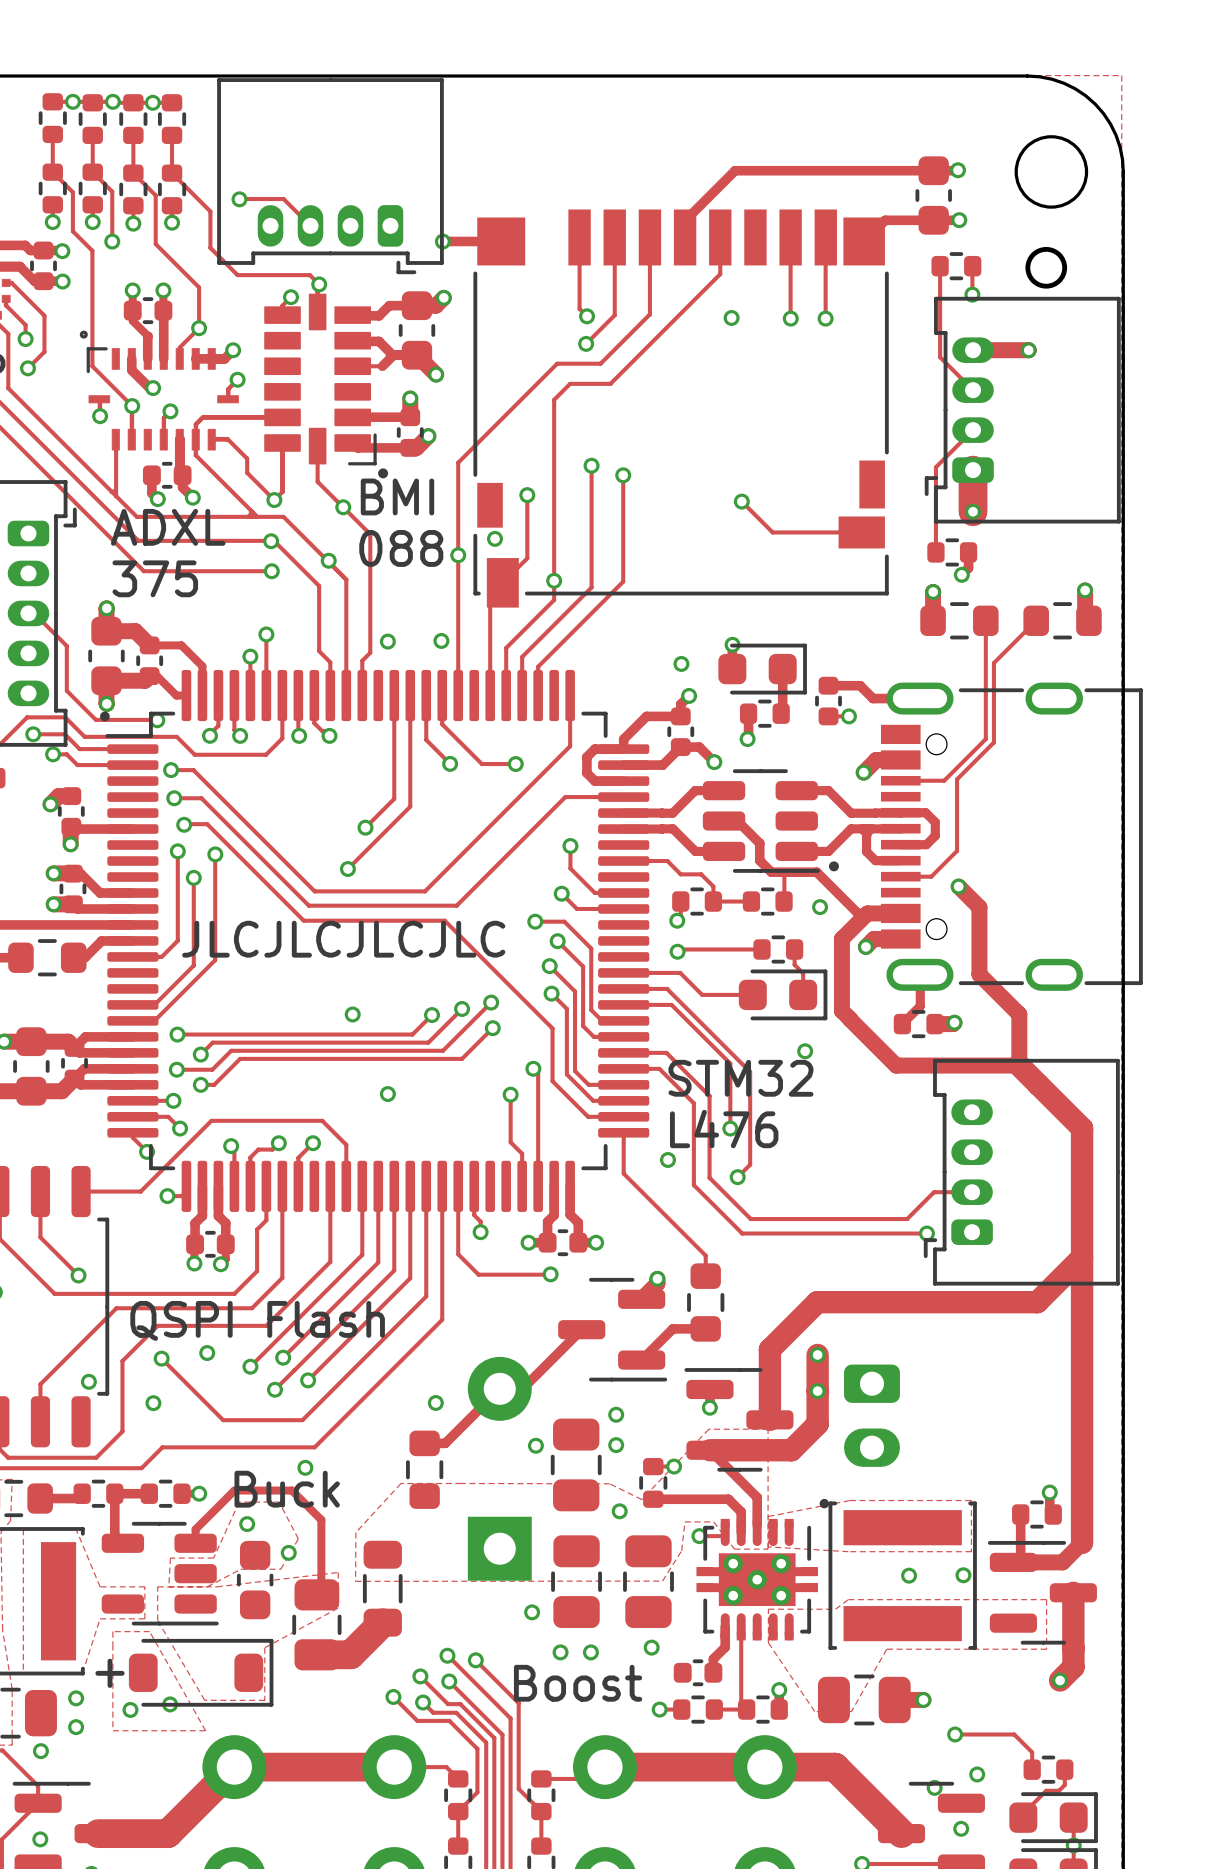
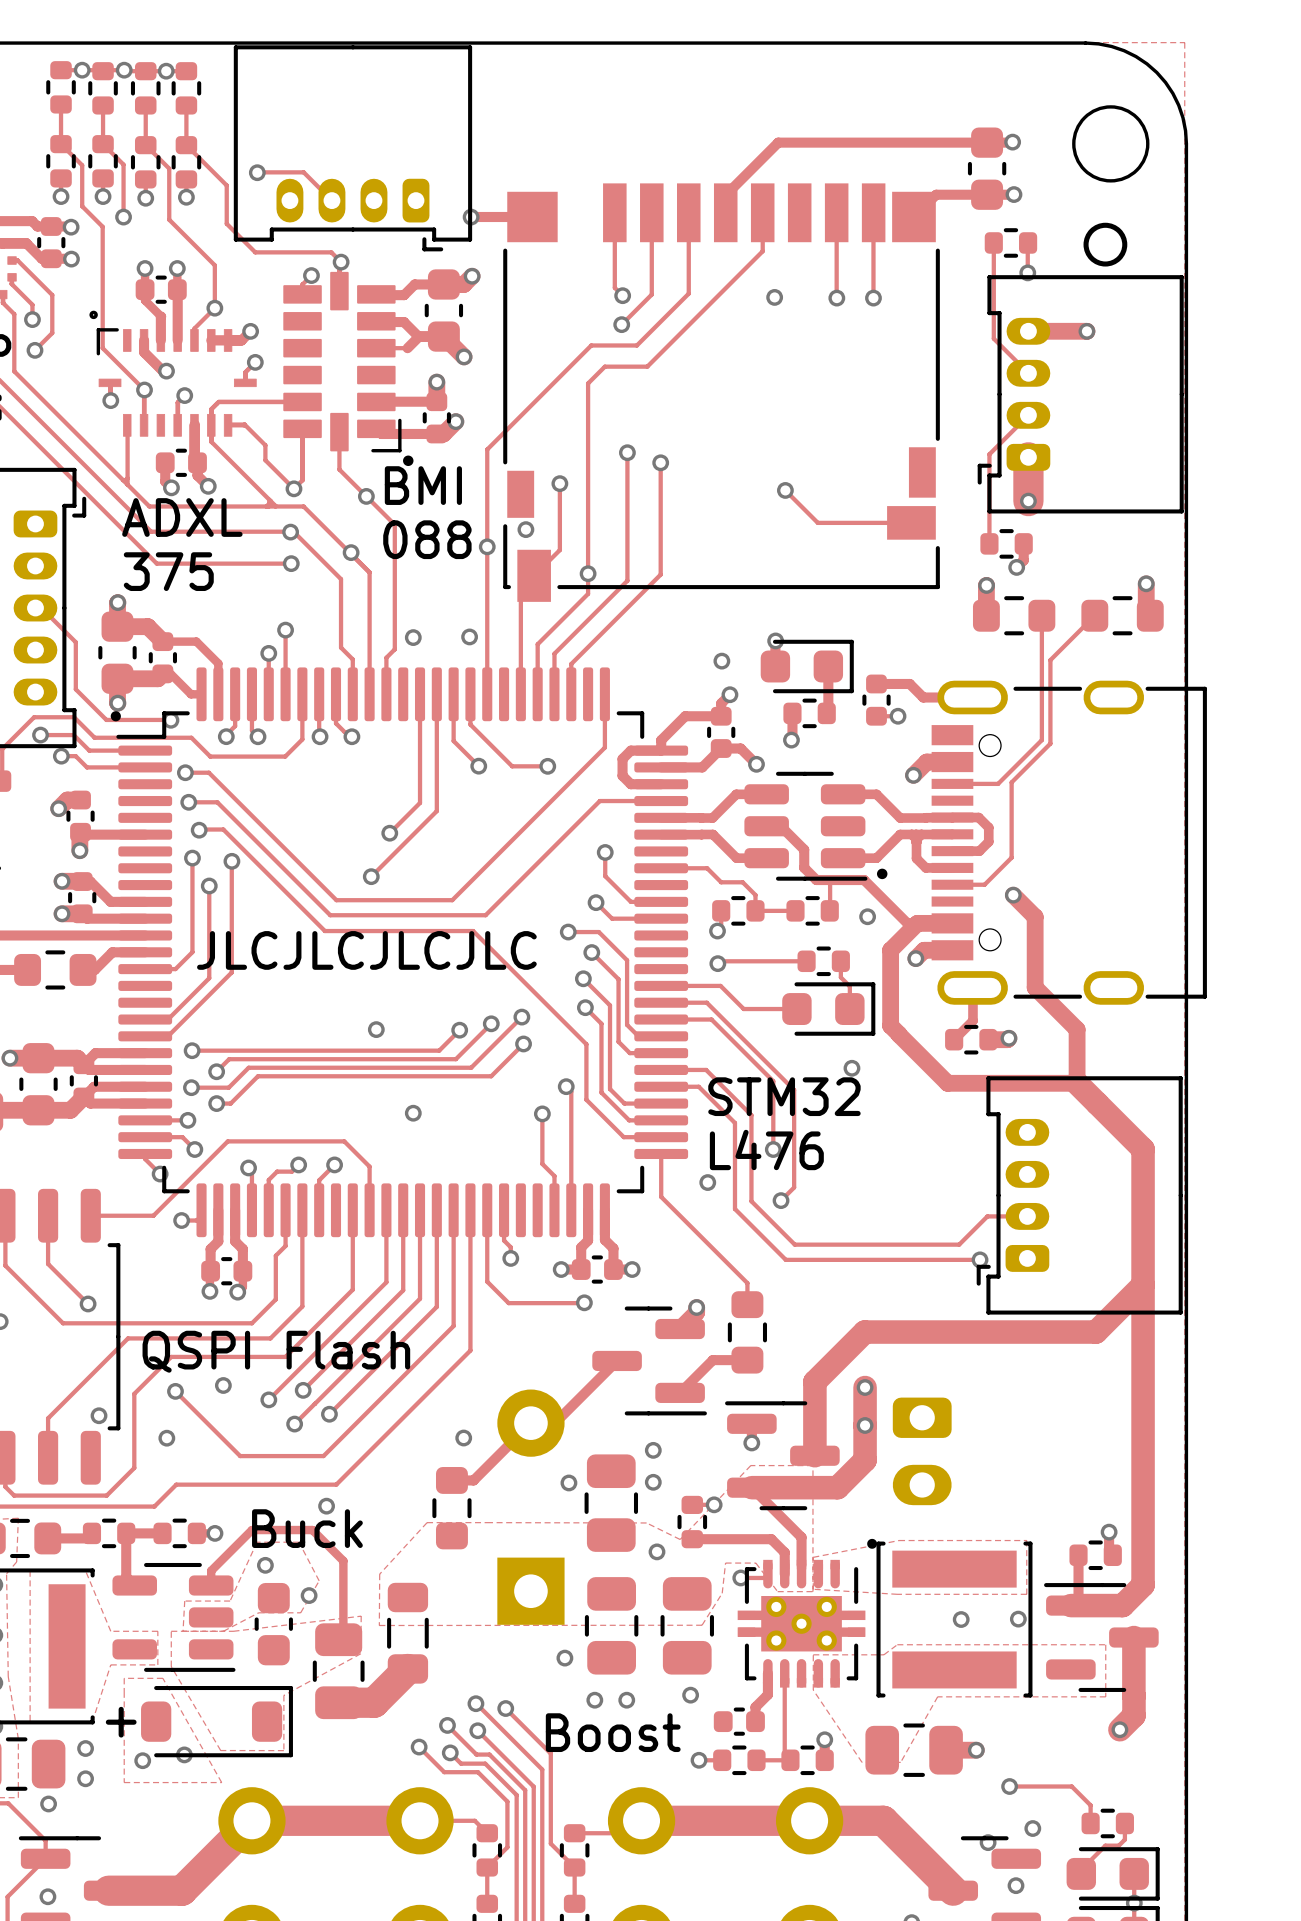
track width: thin (1082, 1542) (1062, 1562) (1013, 1562) -> thick (1143, 1585) (1122, 1605) (1070, 1605)

